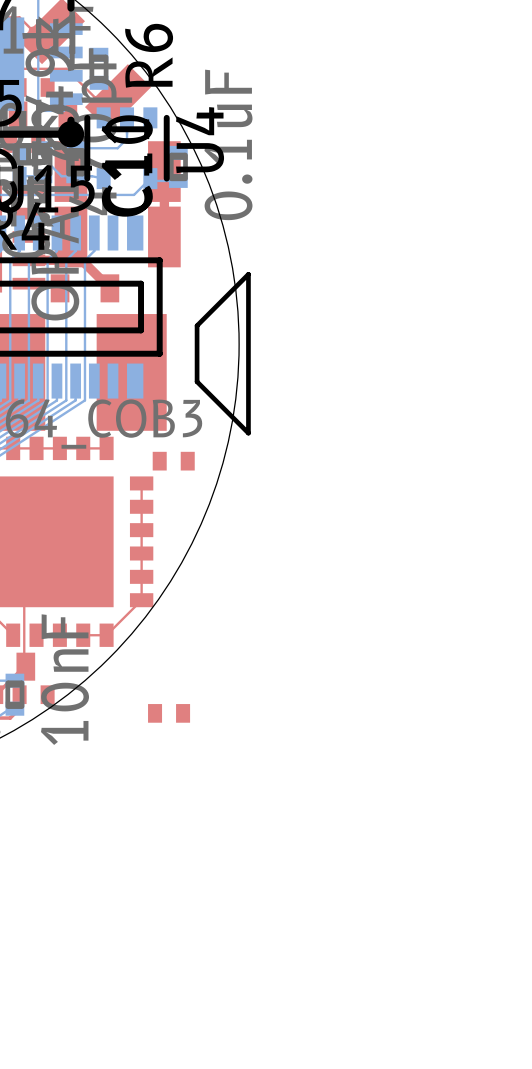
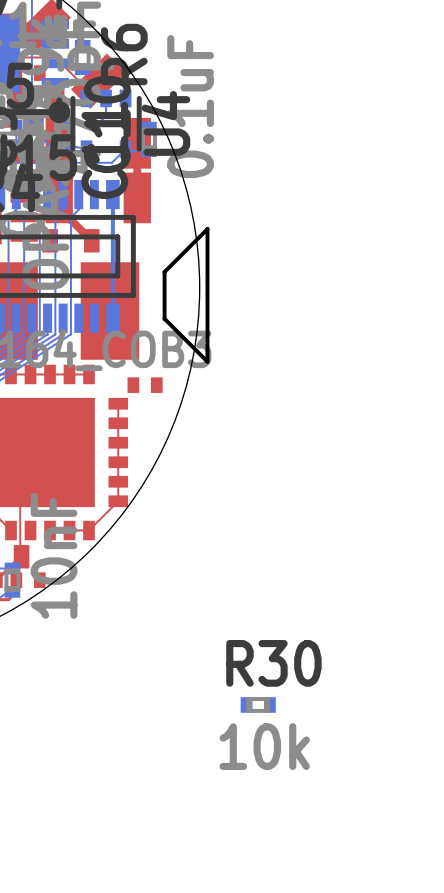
bottom track: none -> (112, 194) (112, 318)
R30 side: top (169, 713) -> bottom (258, 704)

